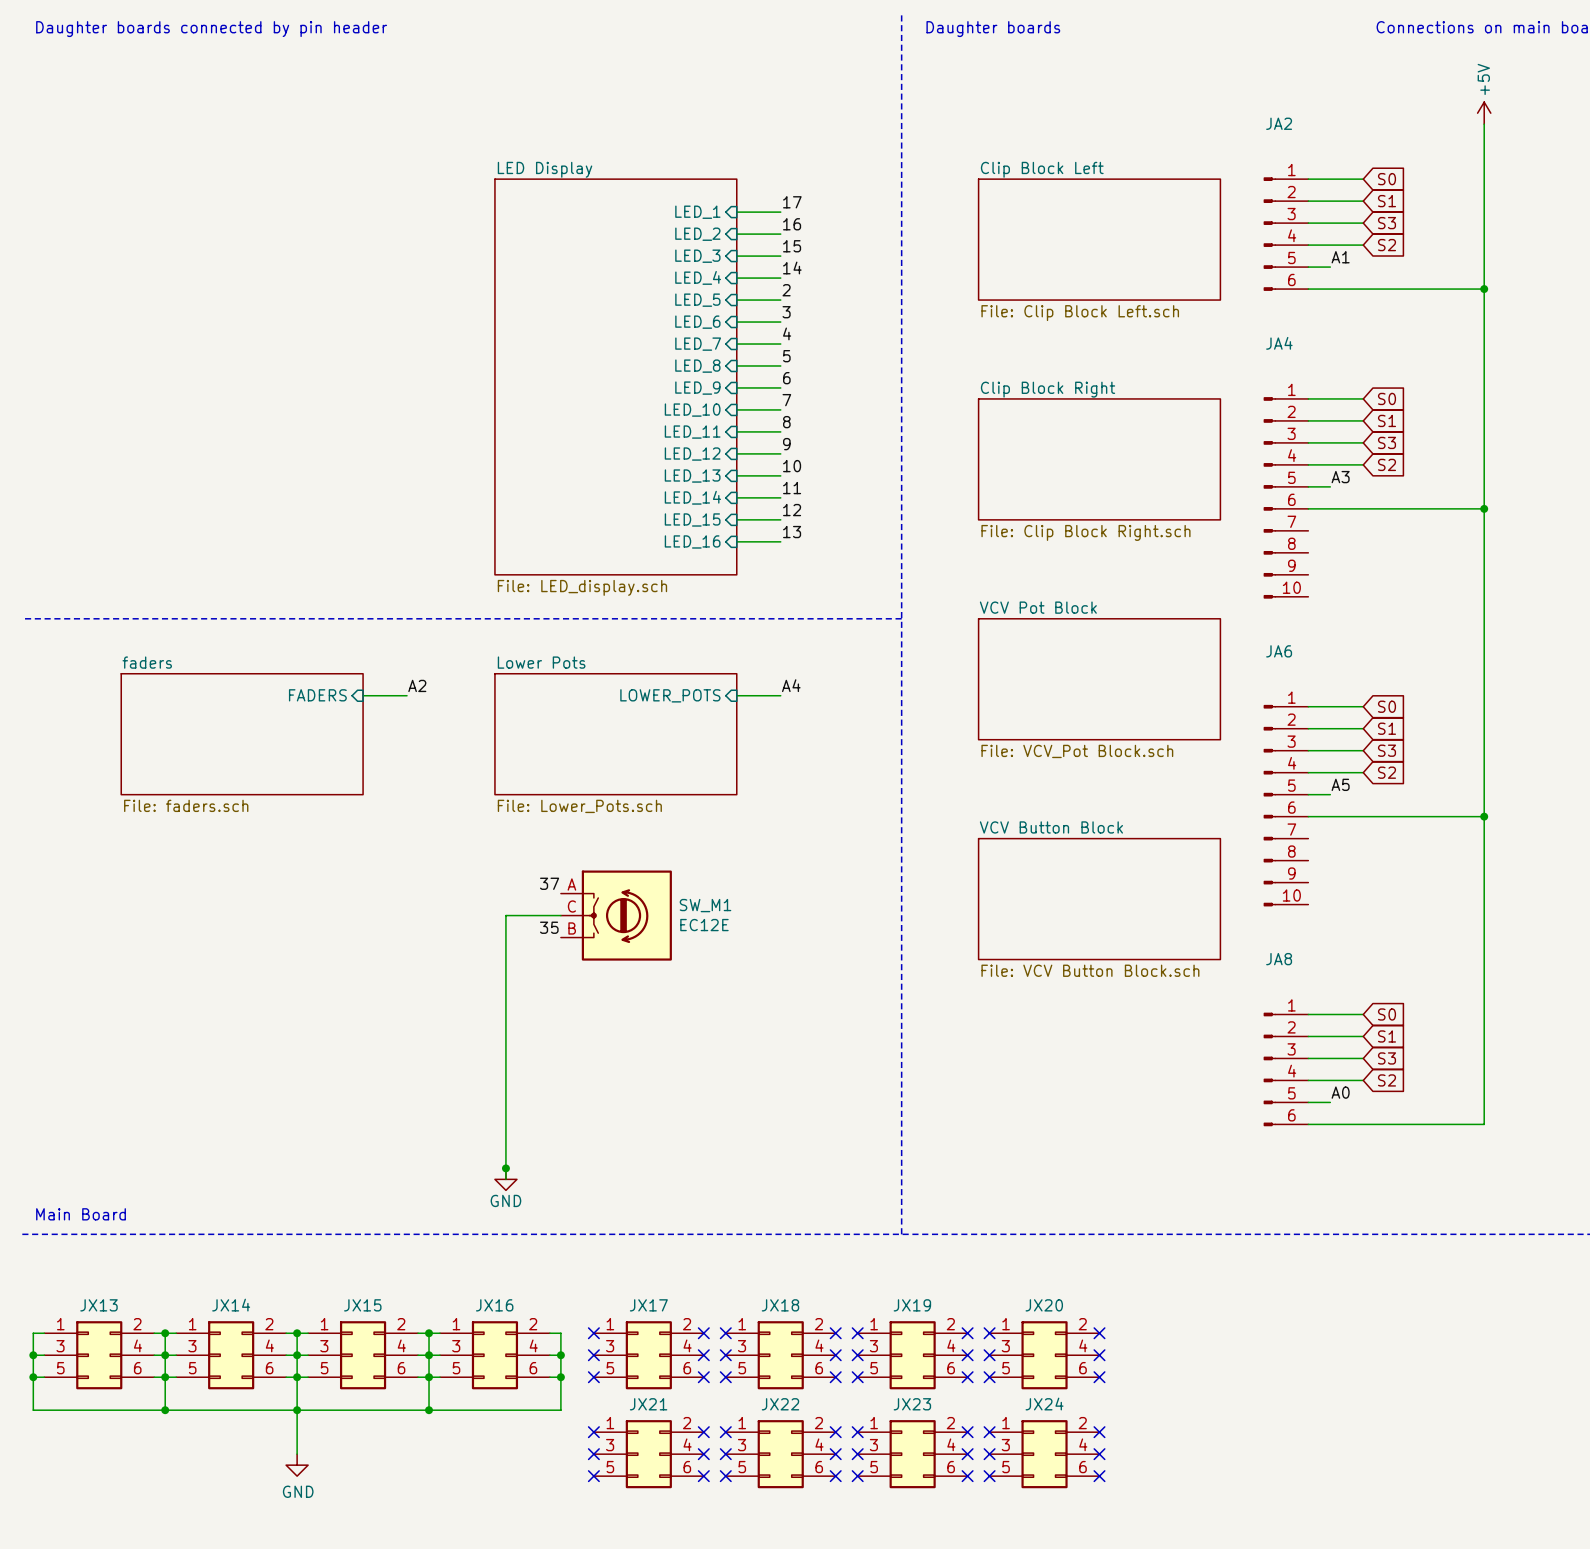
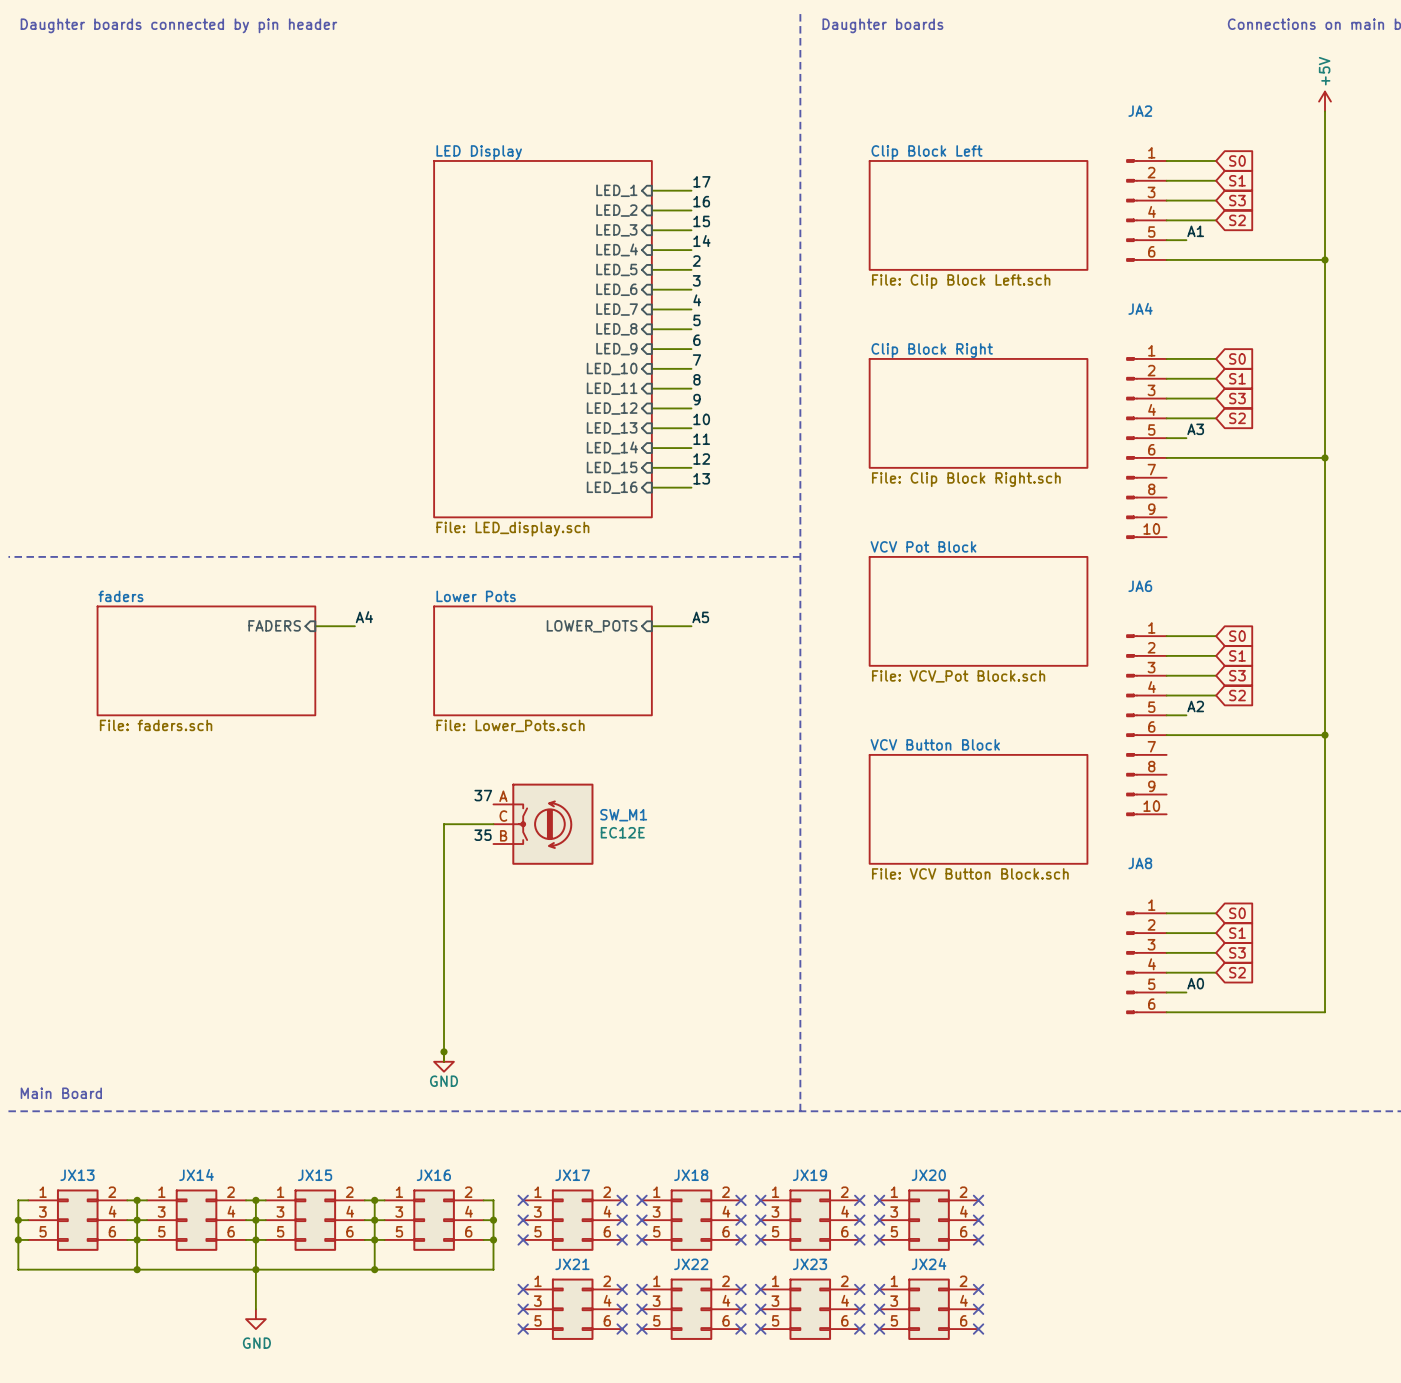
label: A2 (417, 685) -> A4 (364, 617)
label: A4 (791, 685) -> A5 (700, 617)
label: A5 (1340, 784) -> A2 (1195, 706)

